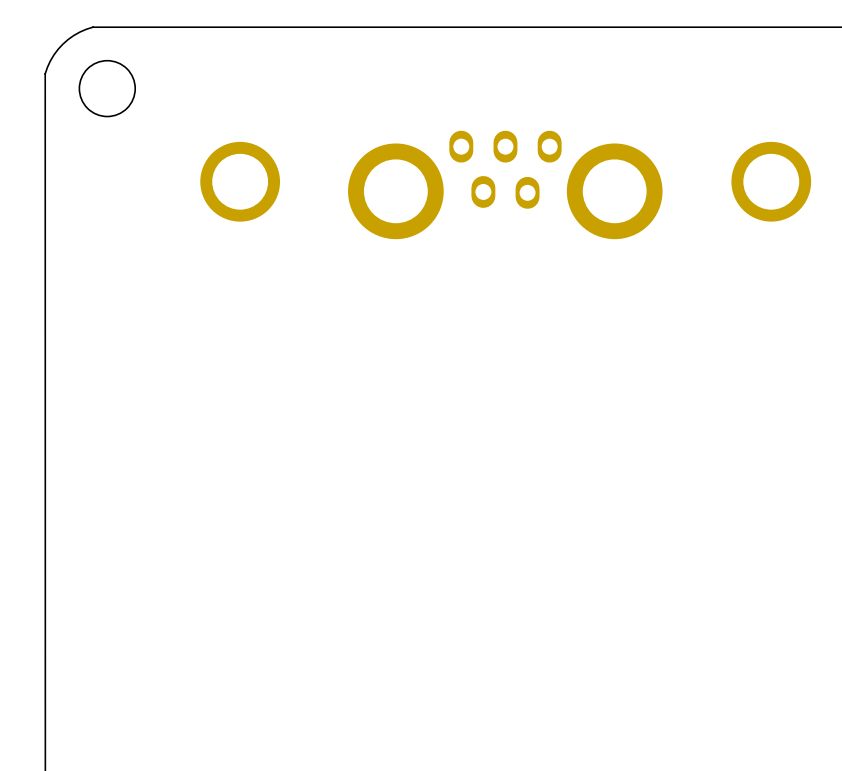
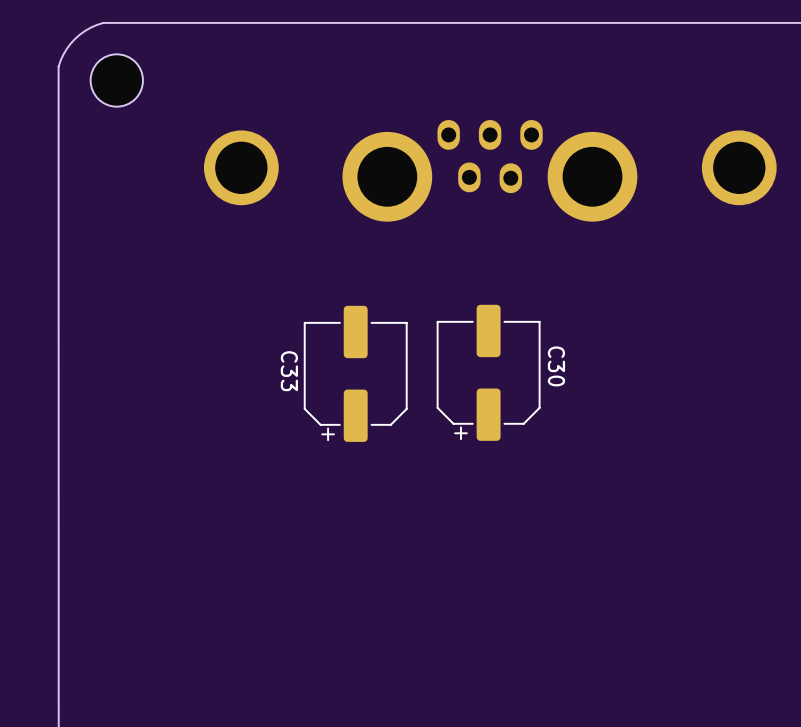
C30: none -> (488, 372)
C33: none -> (355, 373)

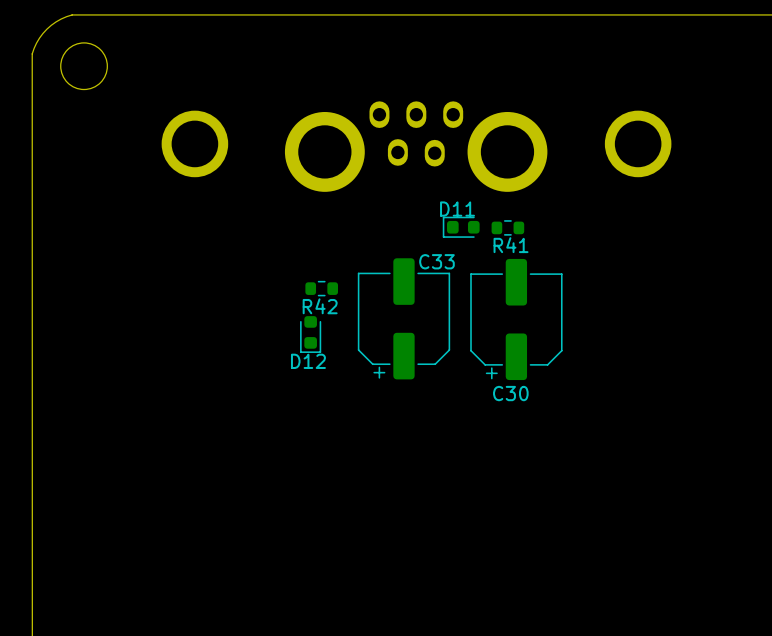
D11: none -> (461, 227)
R41: none -> (507, 227)
R42: none -> (321, 288)
C30 name rotation: 0° (556, 366) -> 90° counterclockwise (510, 393)
C30 name position: C30 (556, 366) -> C30 (510, 393)
C33 name rotation: 0° (289, 371) -> 90° counterclockwise (436, 261)
C33 name position: C33 (289, 371) -> C33 (436, 261)
C30 position: (488, 372) -> (516, 319)
C33 position: (355, 373) -> (403, 318)
D12: none -> (310, 334)

